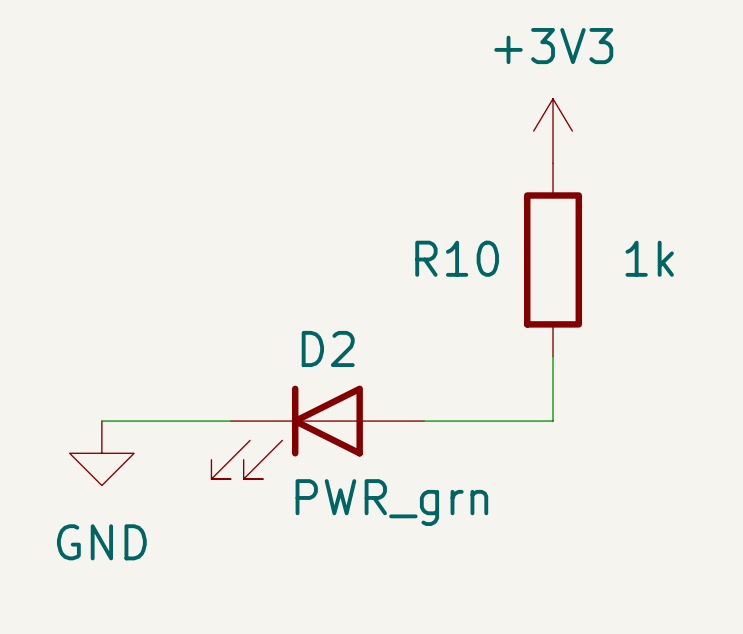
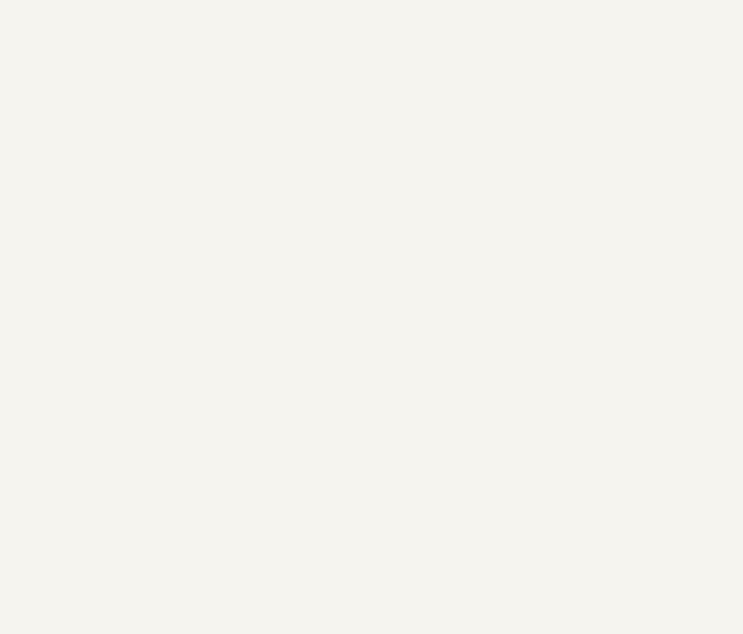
power symbol: +3V3 (553, 131) -> none
R10: 1k (553, 259) -> none
wire: (553, 356) (553, 421) (424, 421) -> none
wire: (101, 421) (230, 421) -> none
D2: PWR_grn (317, 432) -> none
power symbol: GND (101, 453) -> none

